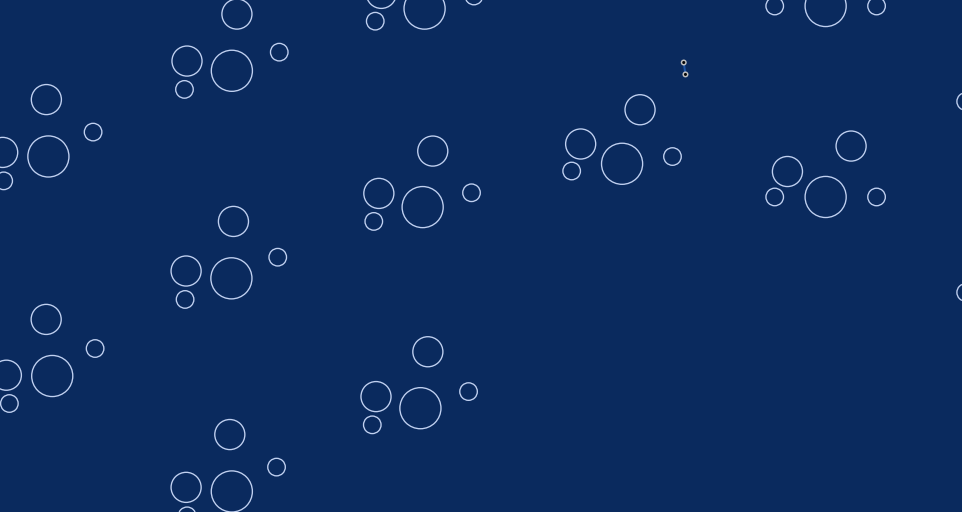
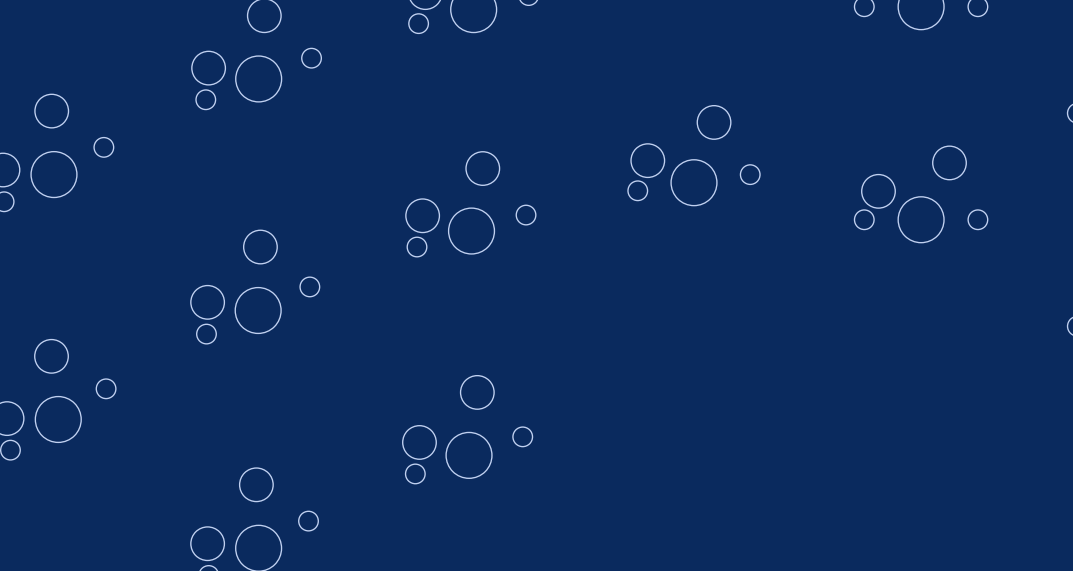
track: (683, 62) (685, 74) -> none
via: (683, 62) -> none
via: (685, 74) -> none

